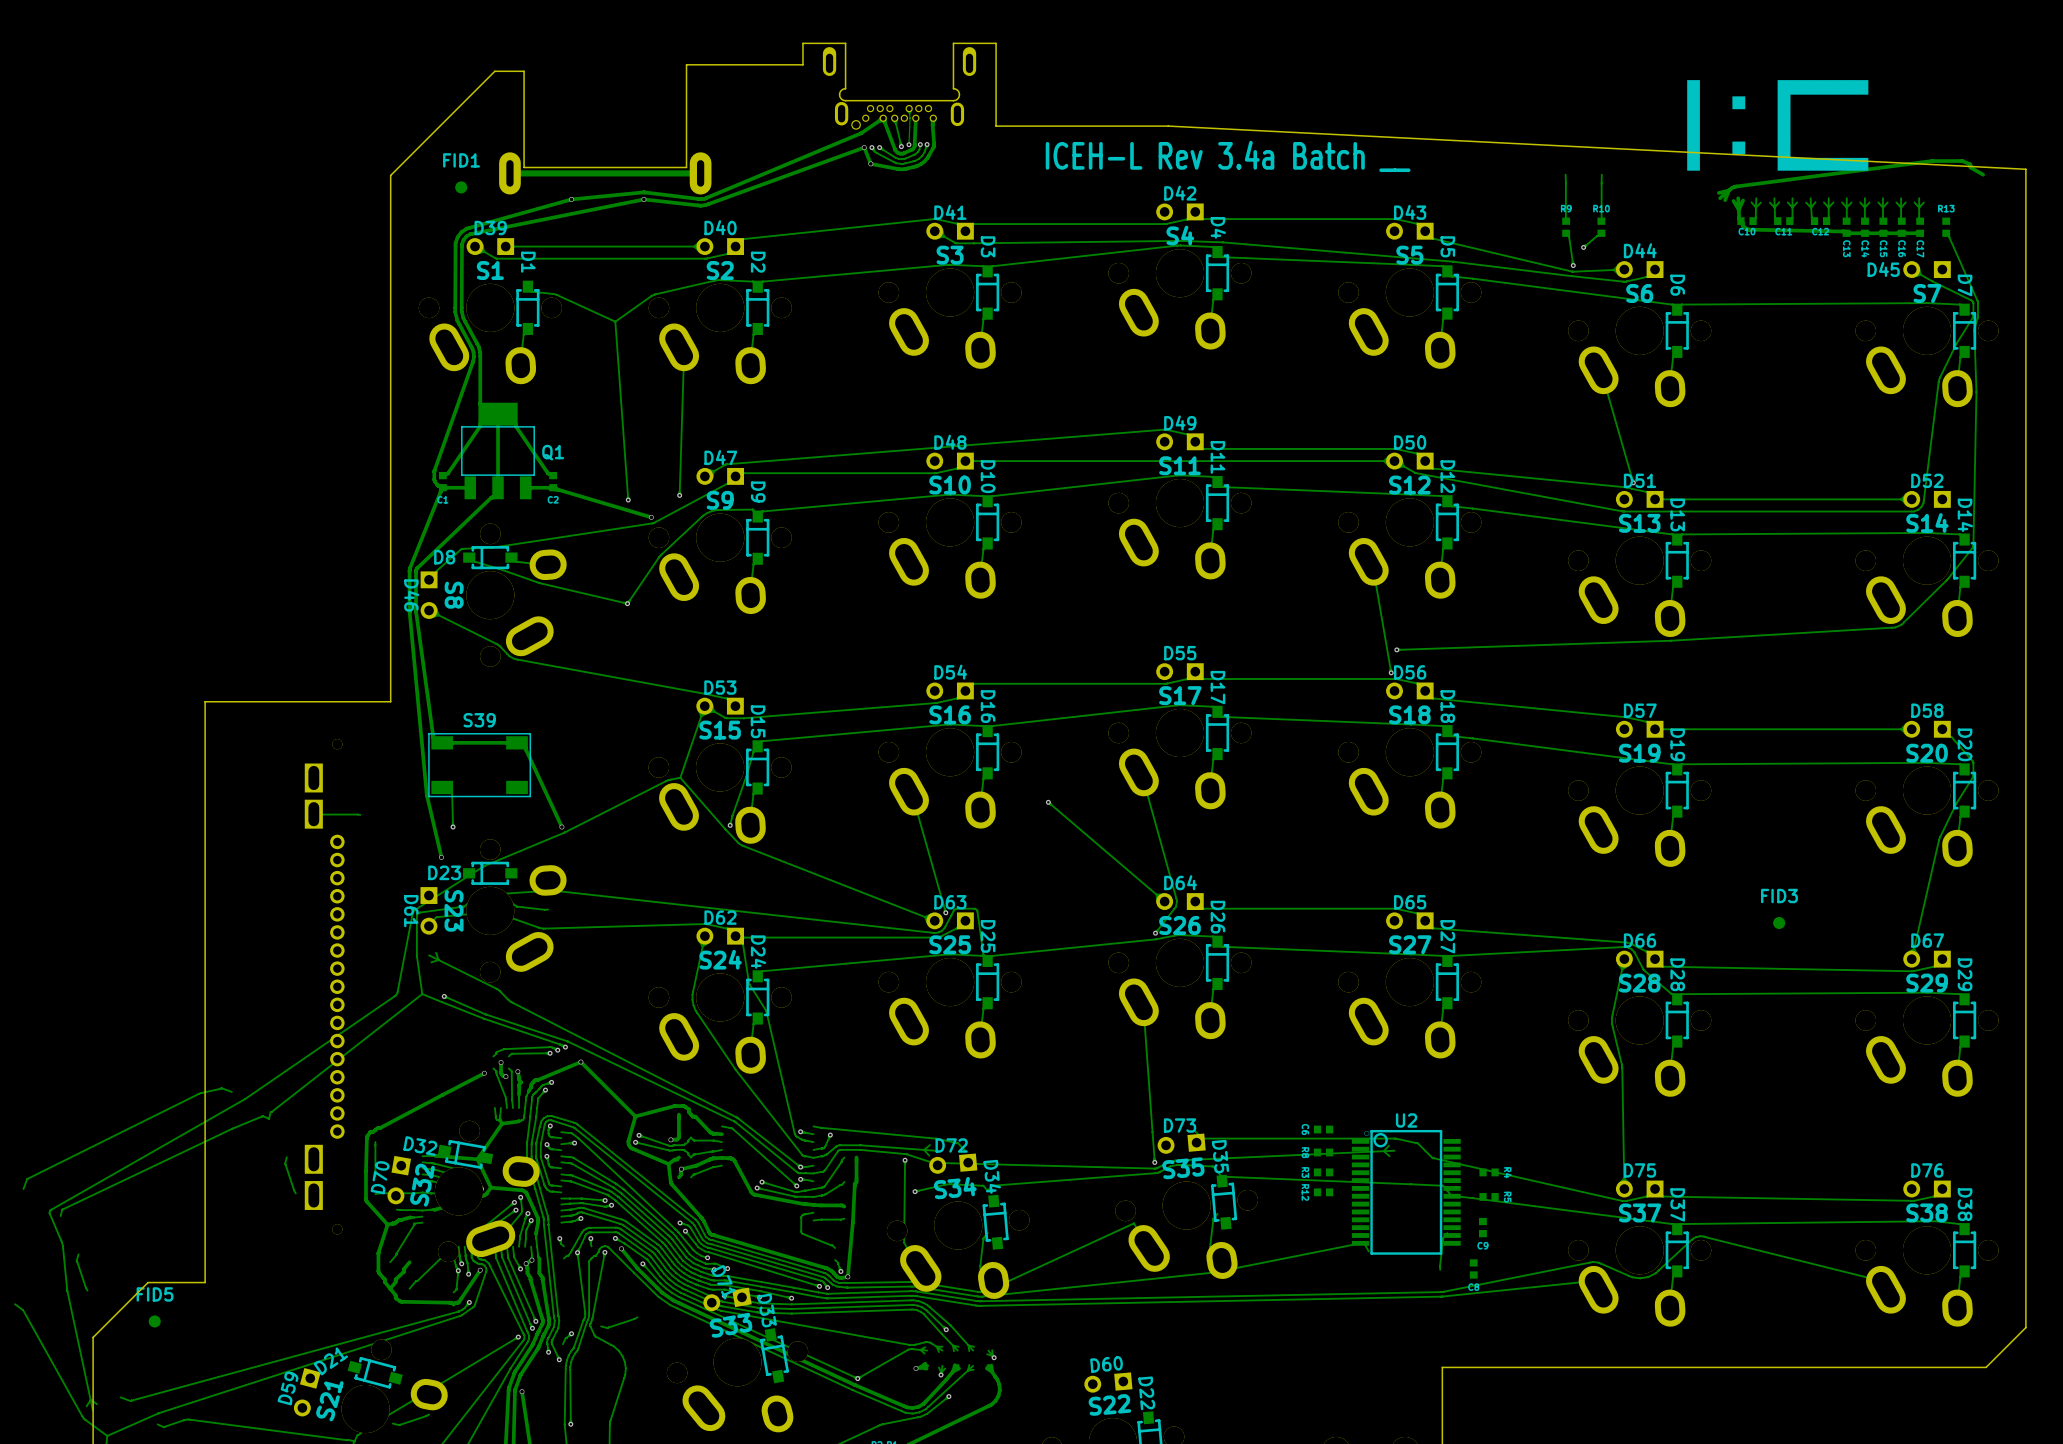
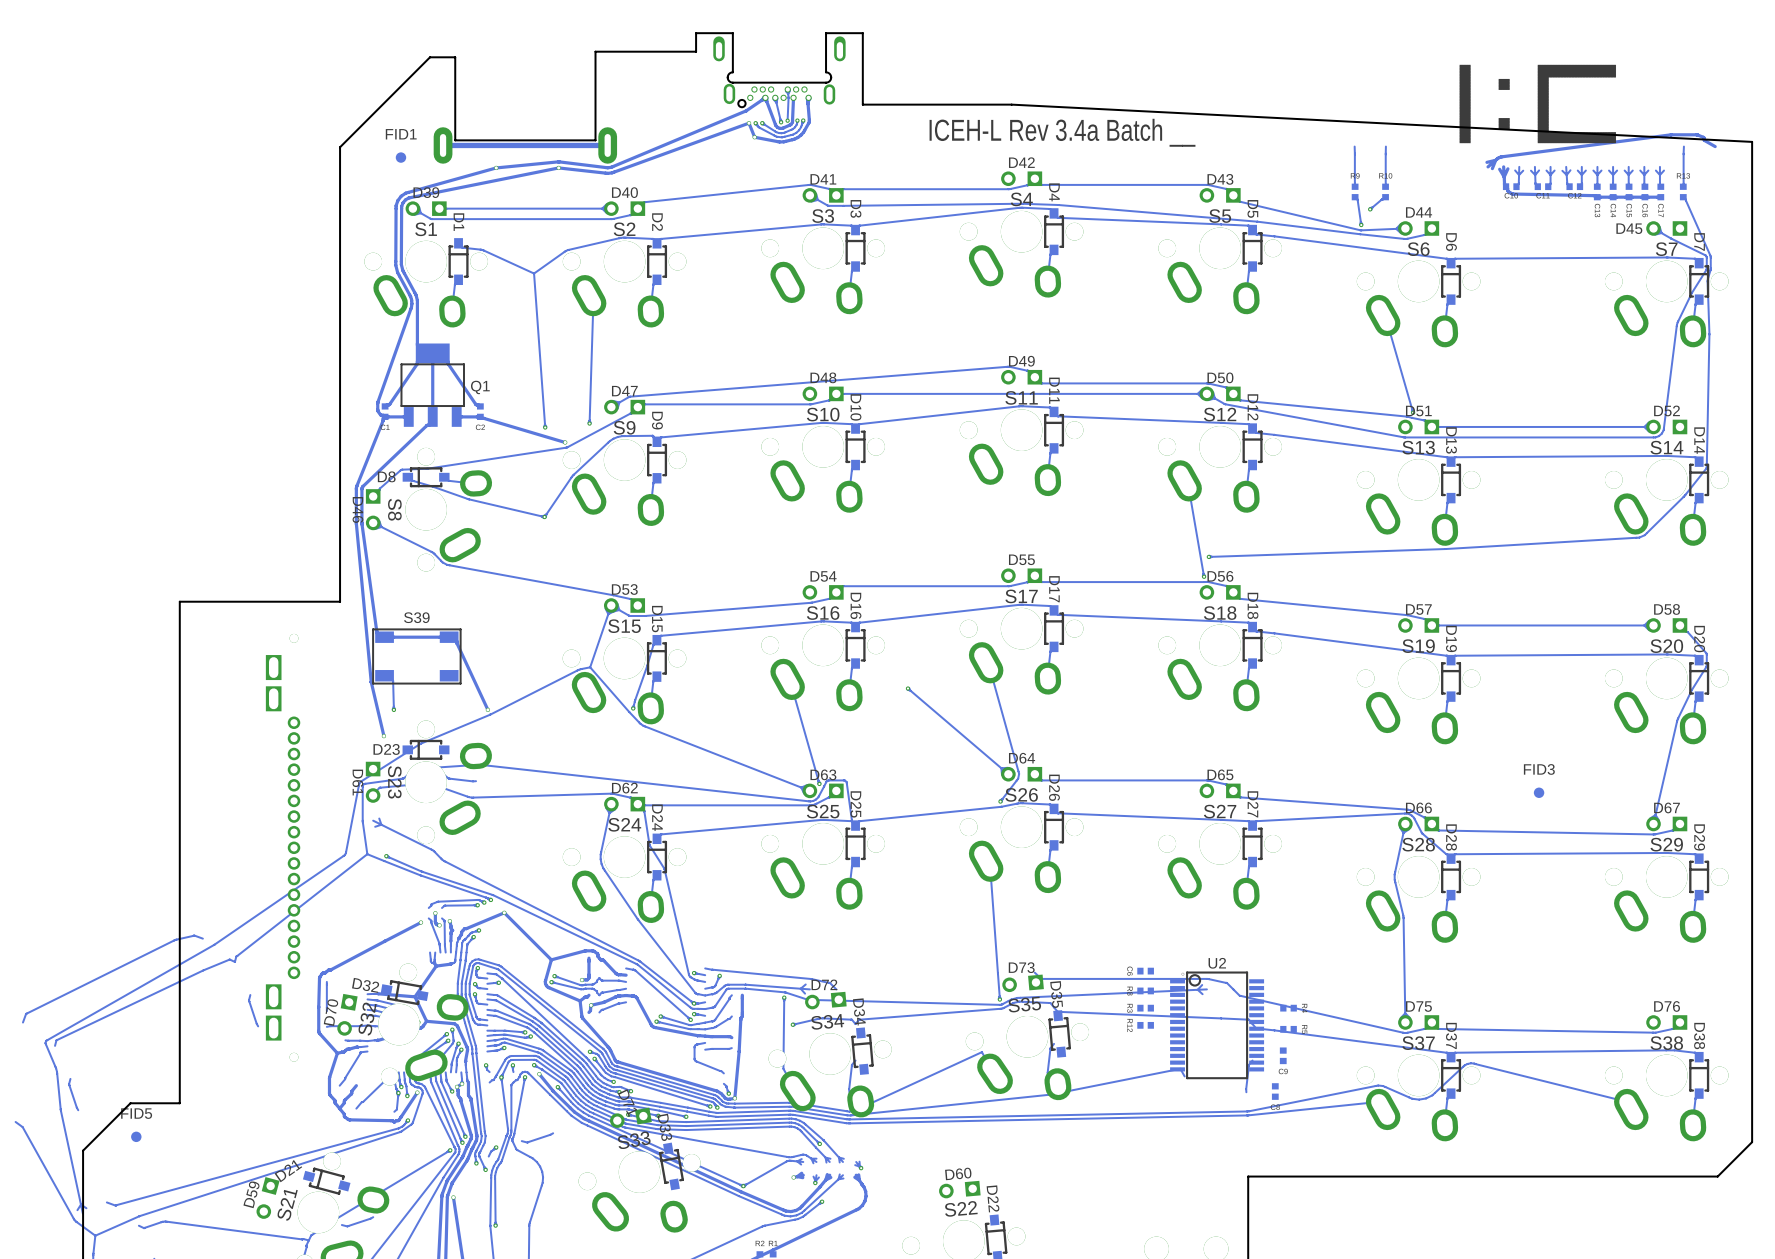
track: none -> (1683, 146) (1683, 186)
track: (313, 814) (360, 814) -> none

